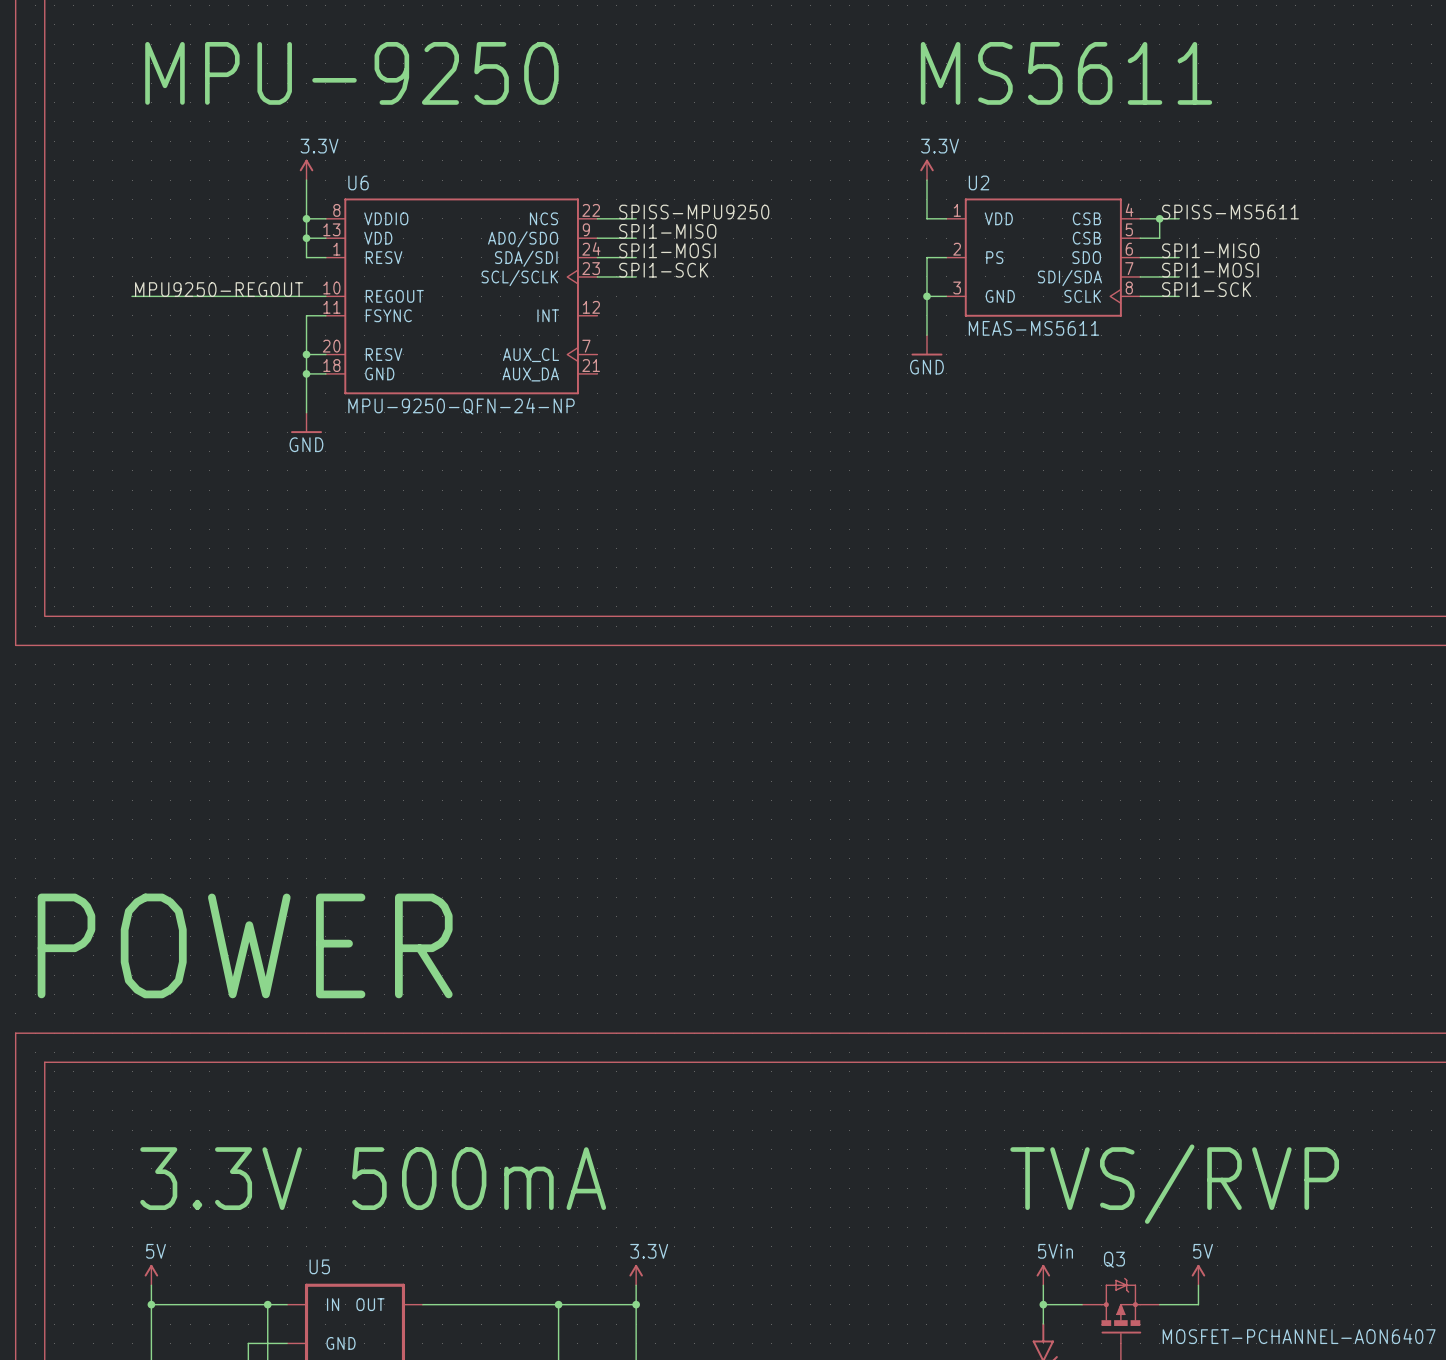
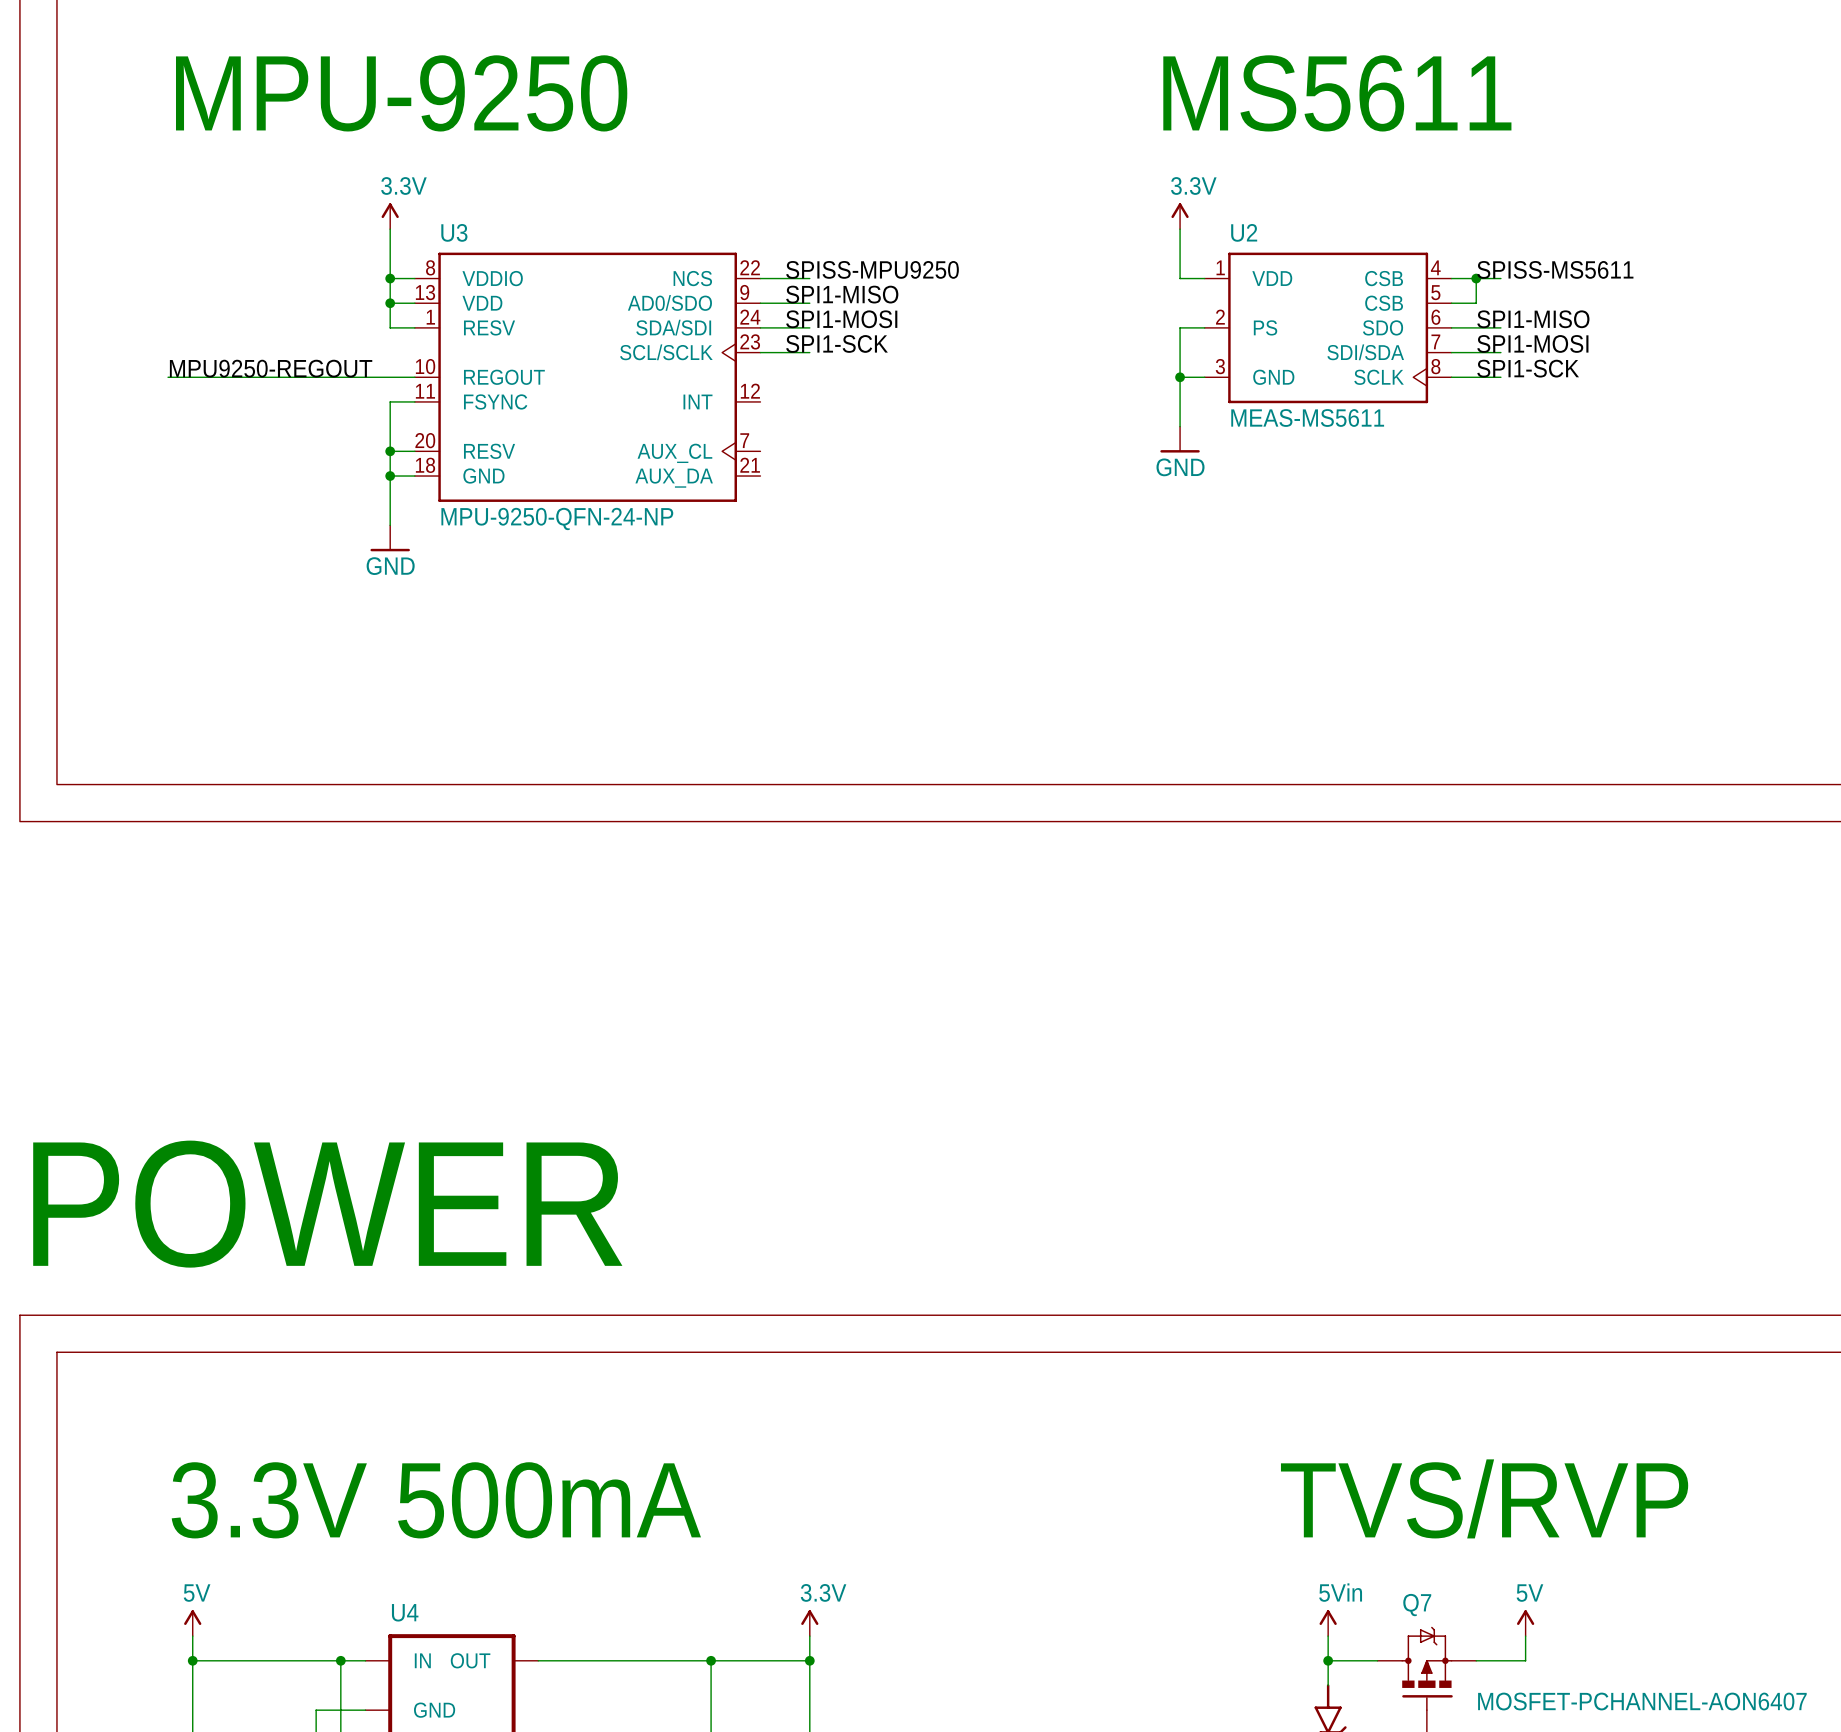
U6 name: U6 (358, 182) -> U3 (454, 232)
Q3 name: Q3 (1114, 1259) -> Q7 (1417, 1605)
U5 name: U5 (319, 1266) -> U4 (405, 1612)

